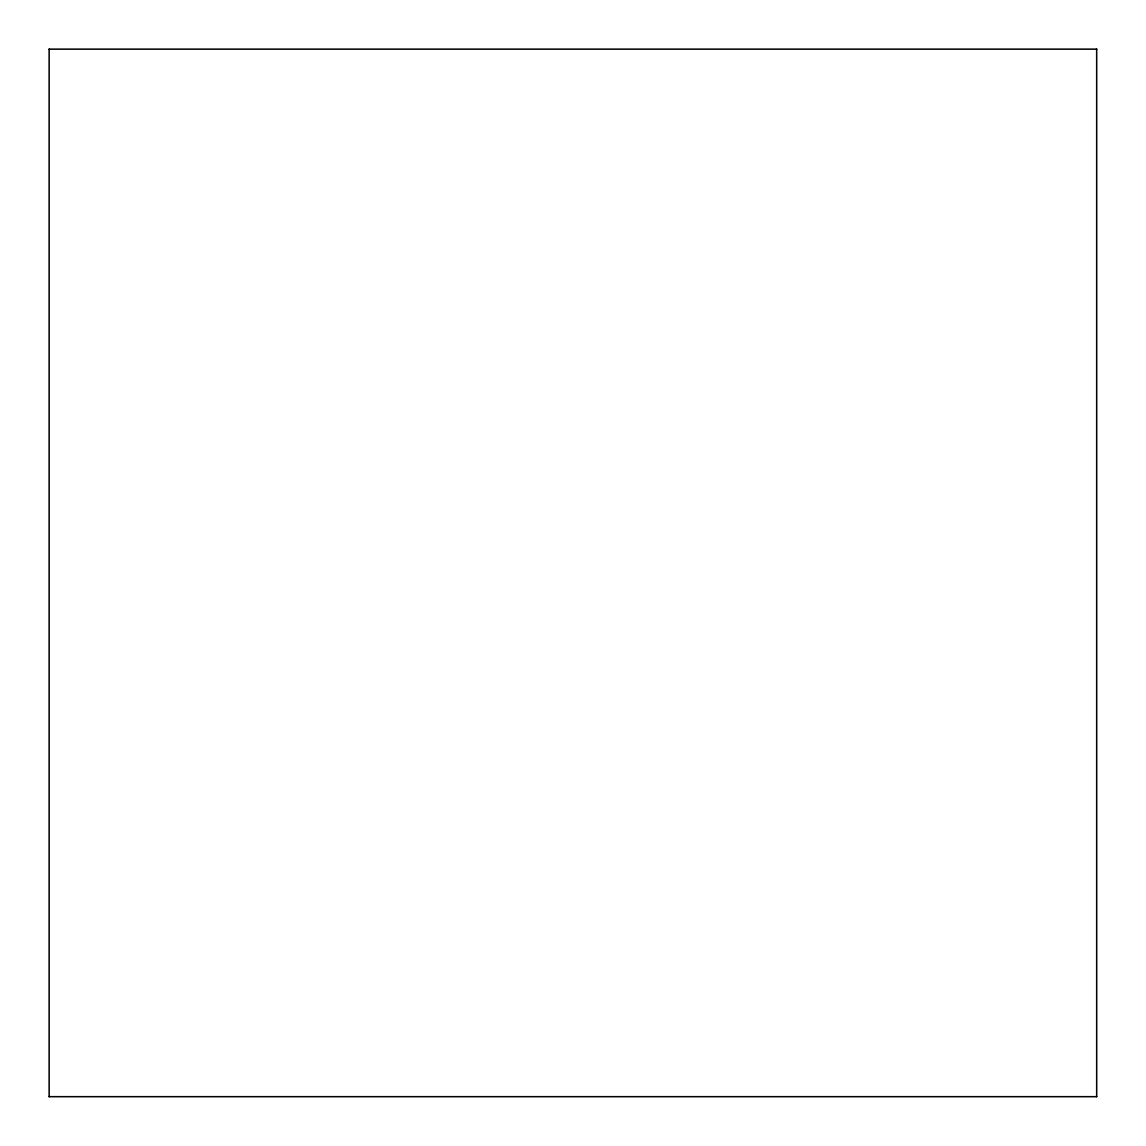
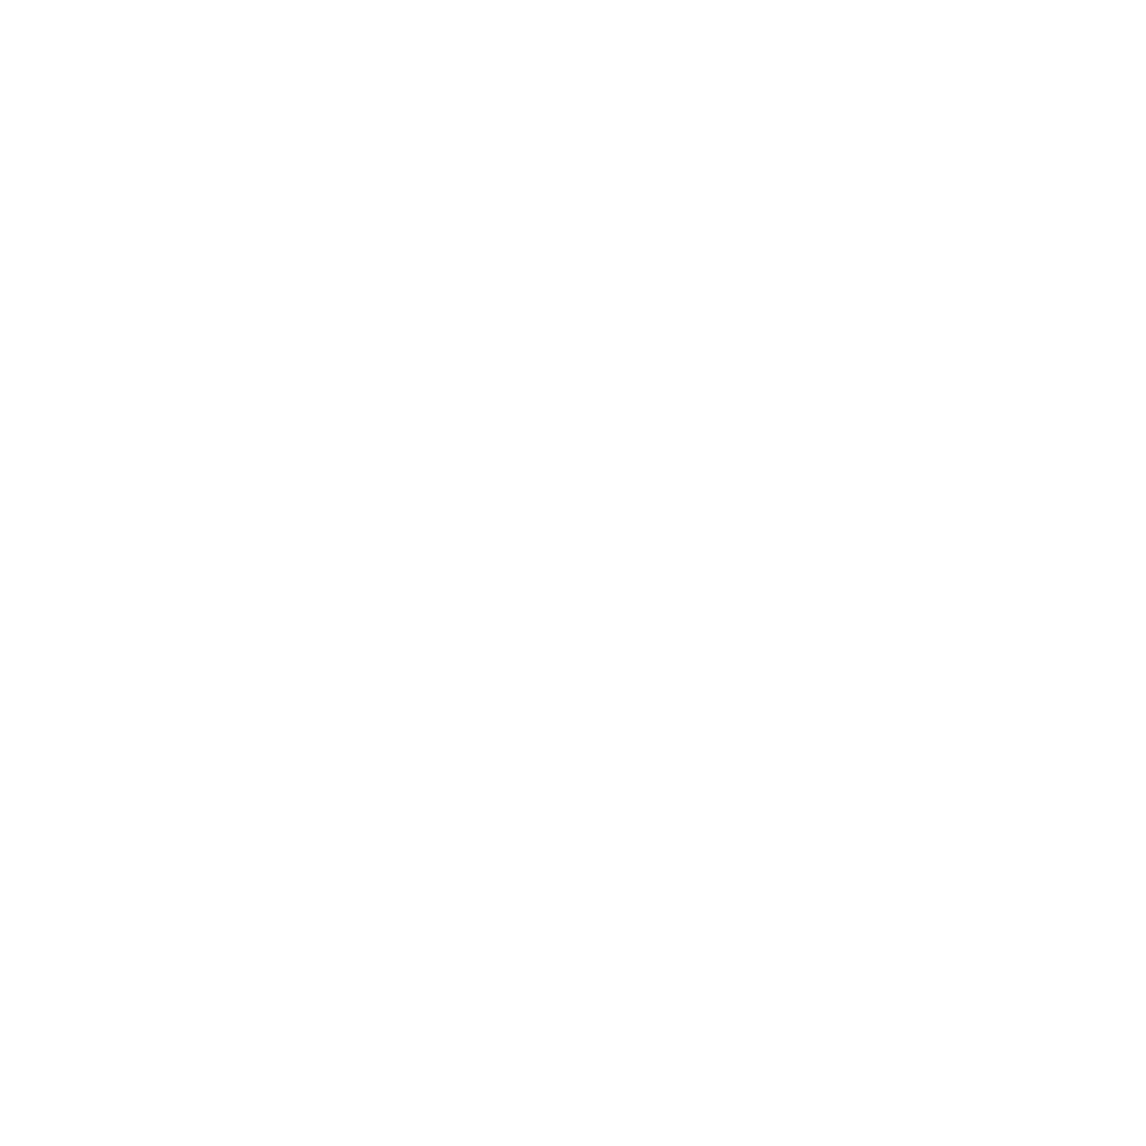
board edge: (49, 49) (1096, 49) (1096, 1096) (49, 1096) (49, 49) -> none

